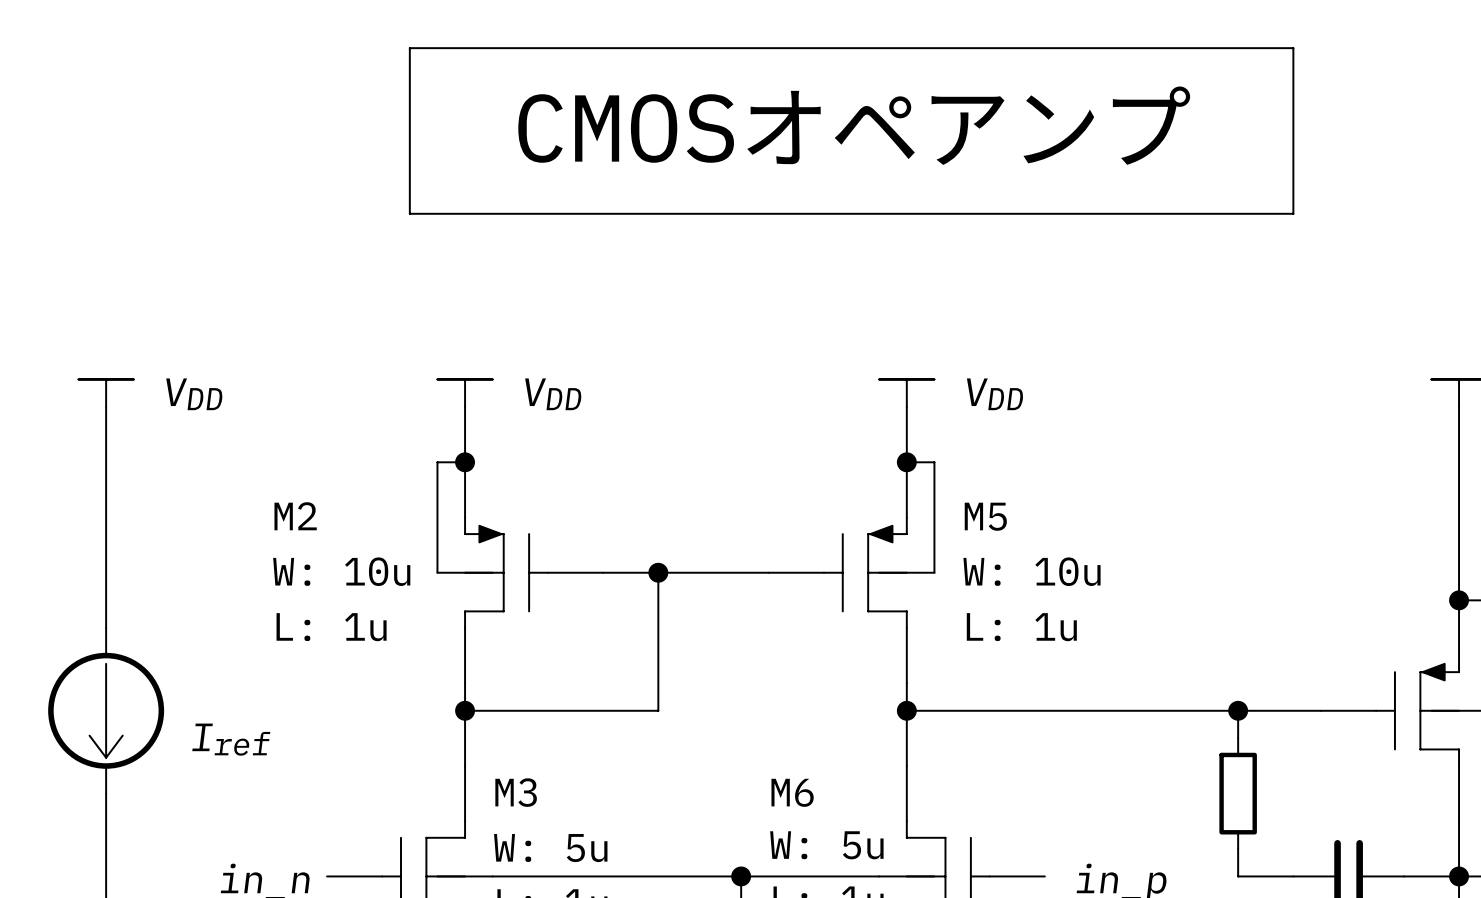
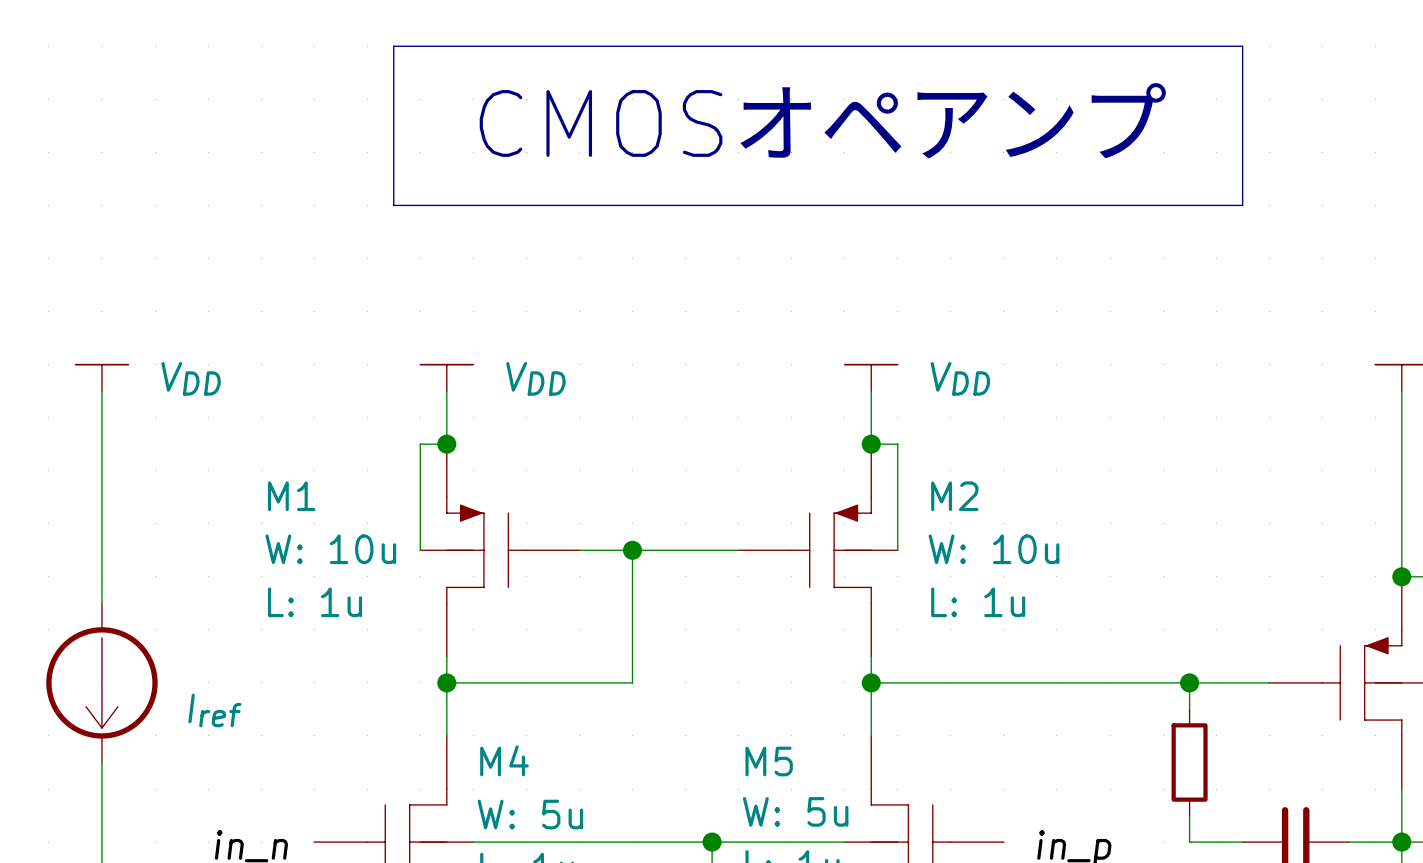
M2 name: M2 (295, 516) -> M1 (291, 496)
M5 name: M5 (985, 516) -> M2 (954, 496)
M3 name: M3 (516, 792) -> M4 (504, 760)
M6 name: M6 (792, 792) -> M5 (769, 761)

